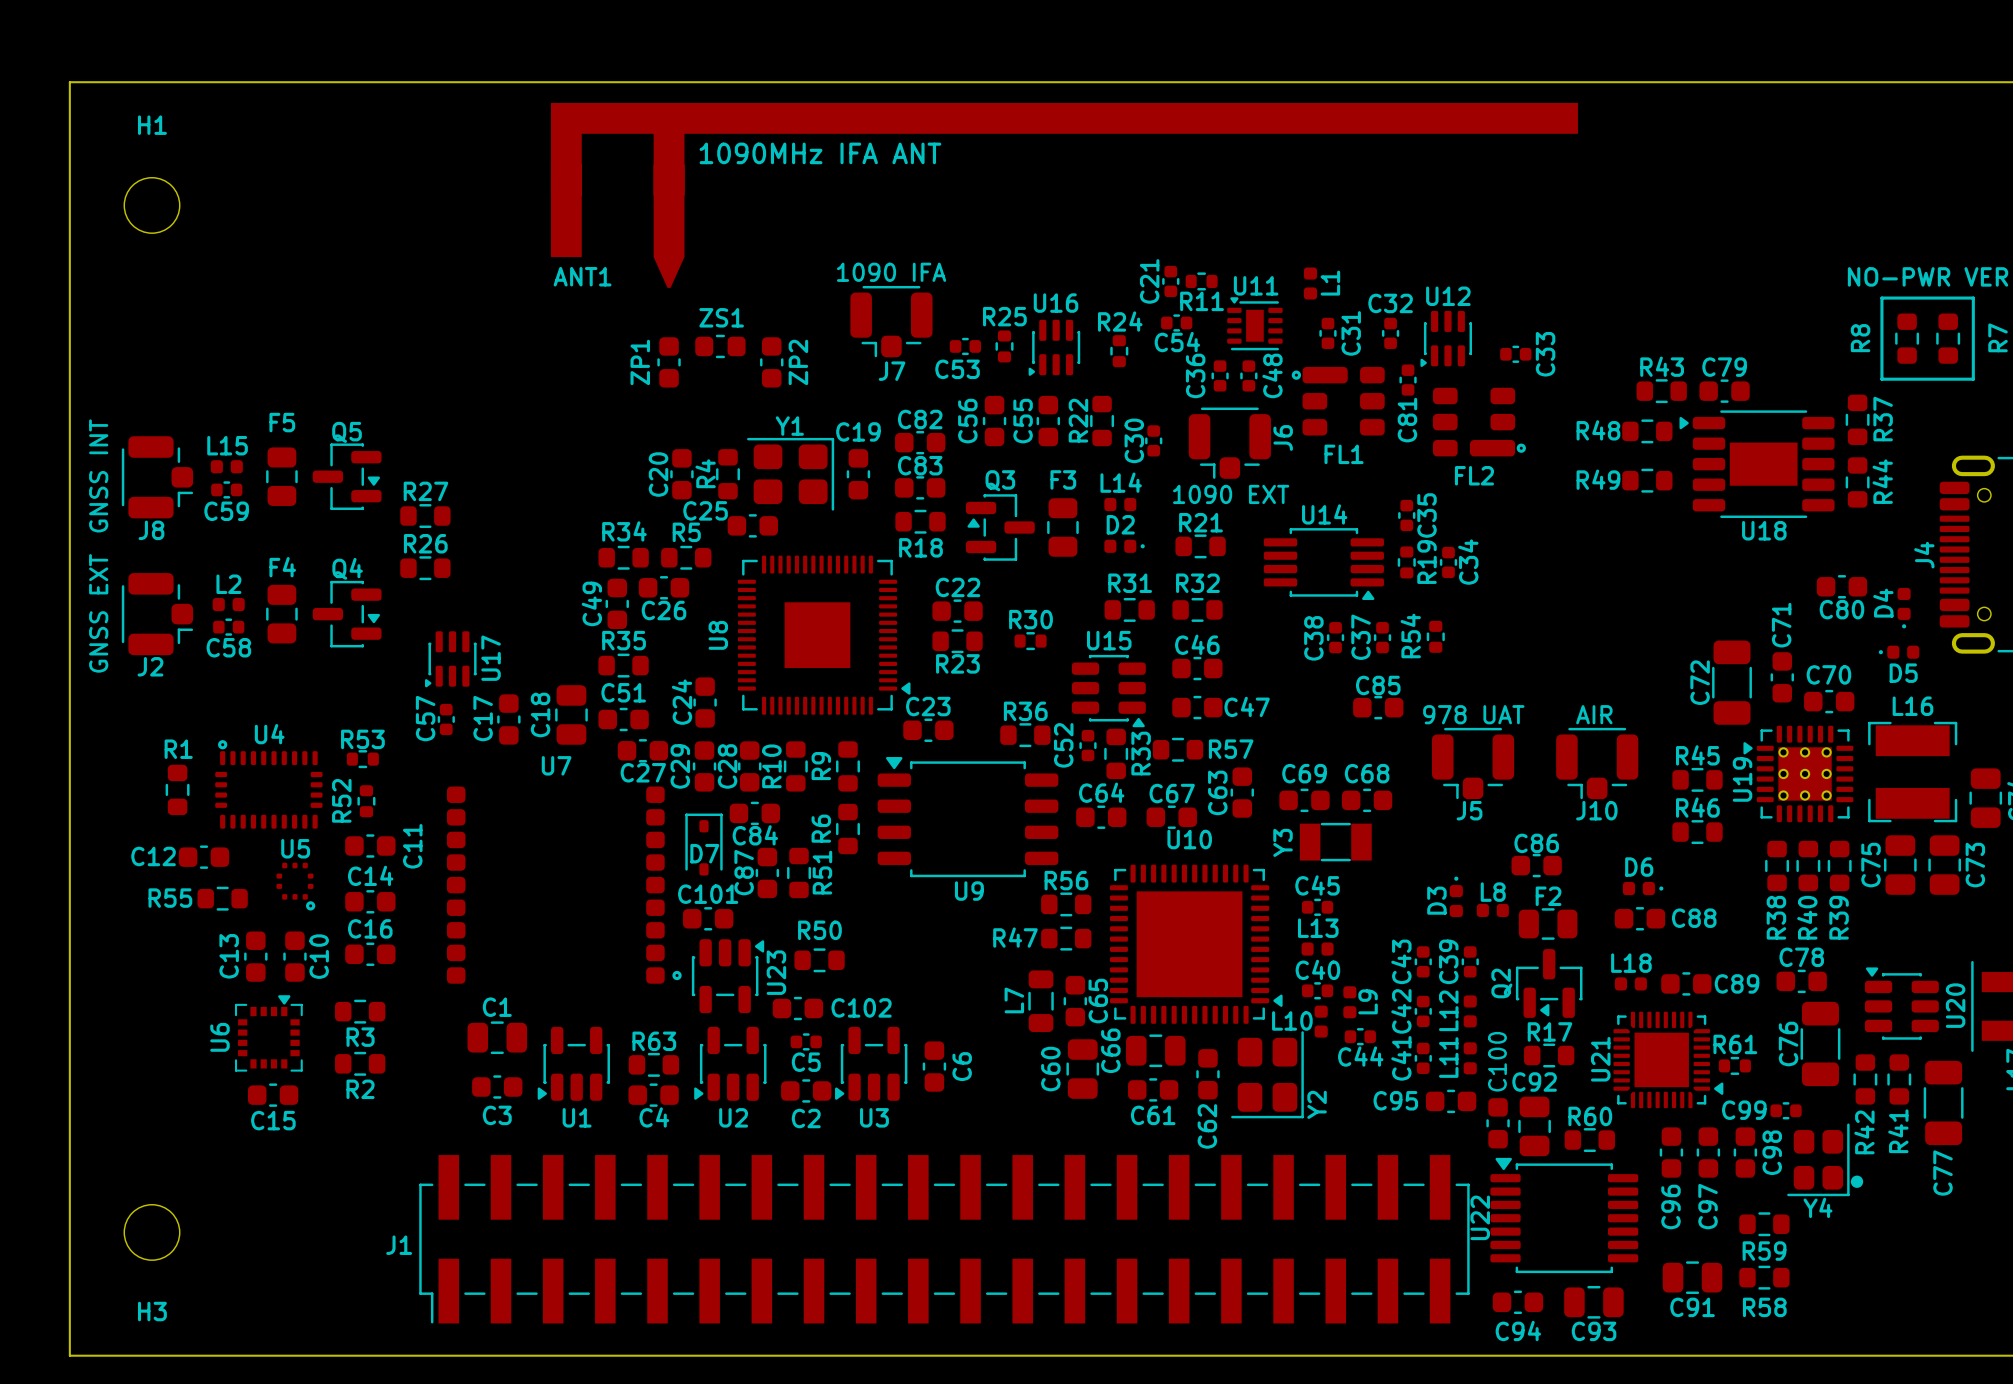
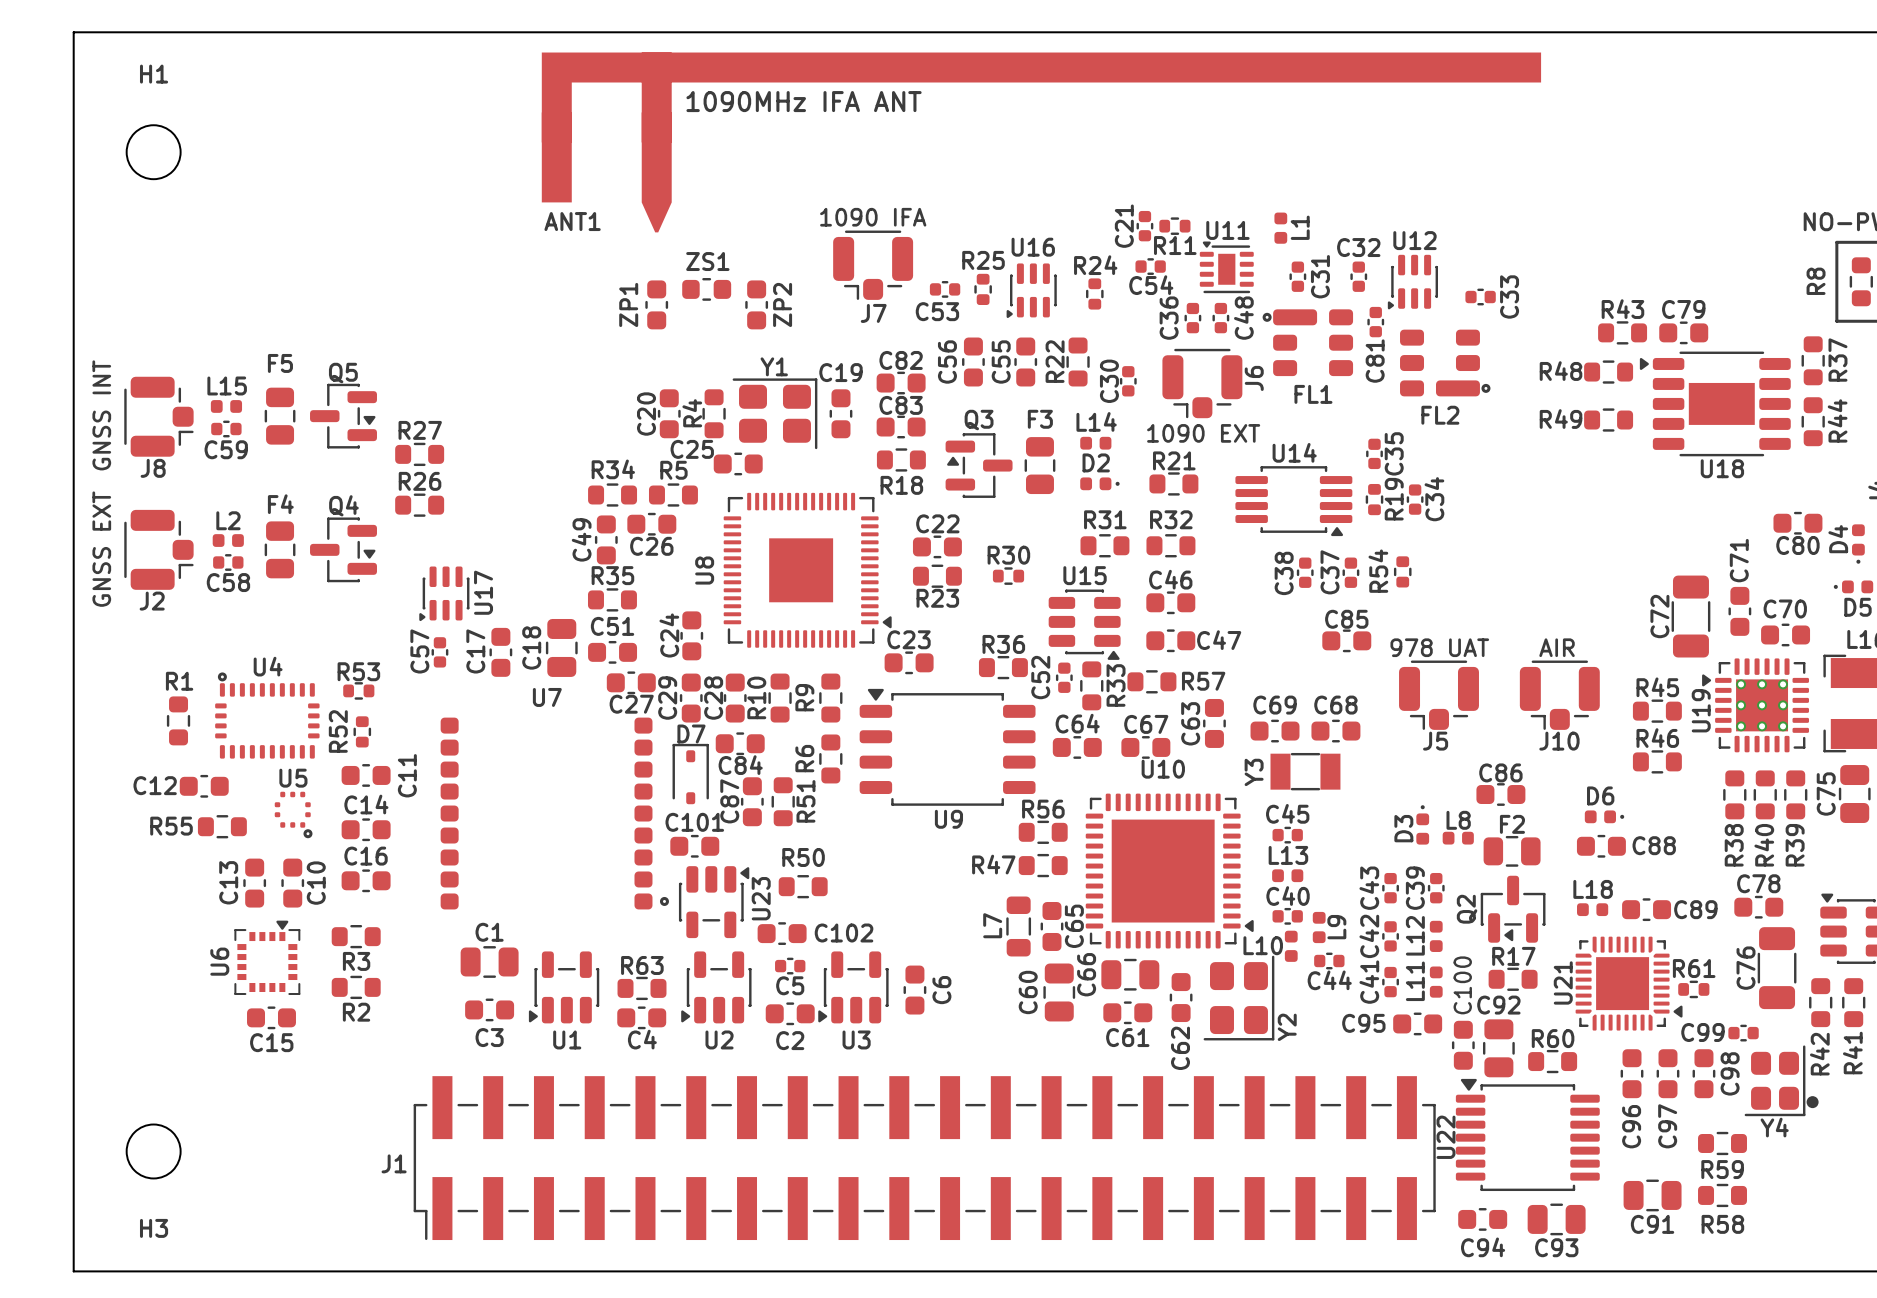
D7 name position: D7 (704, 853) -> D7 (691, 734)

